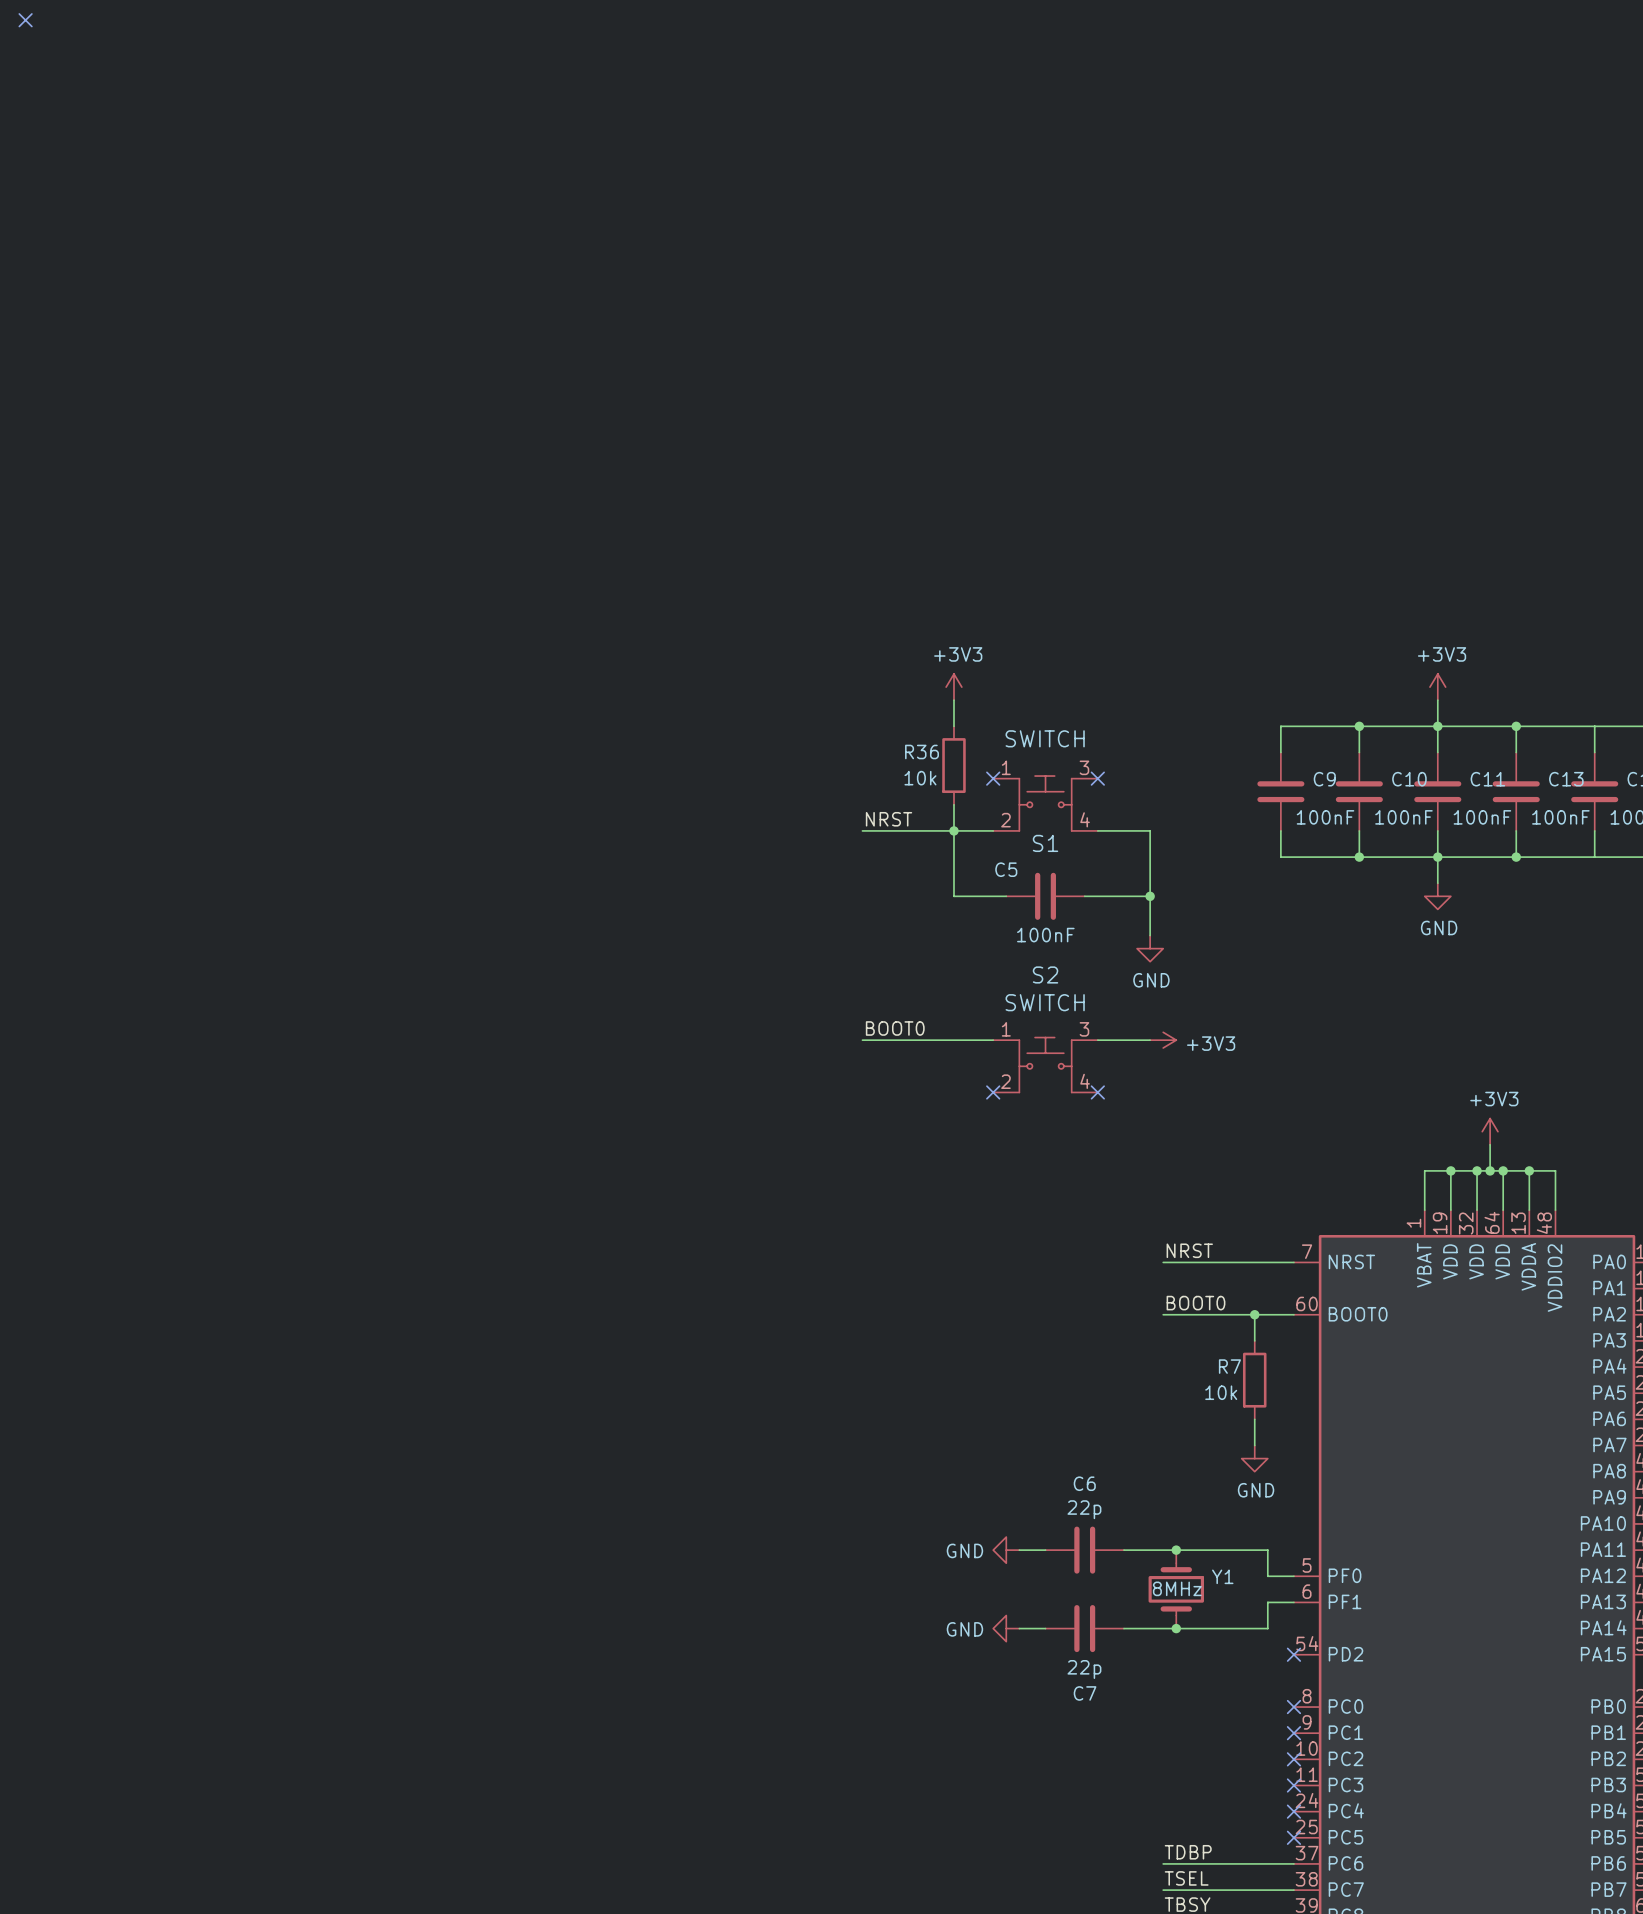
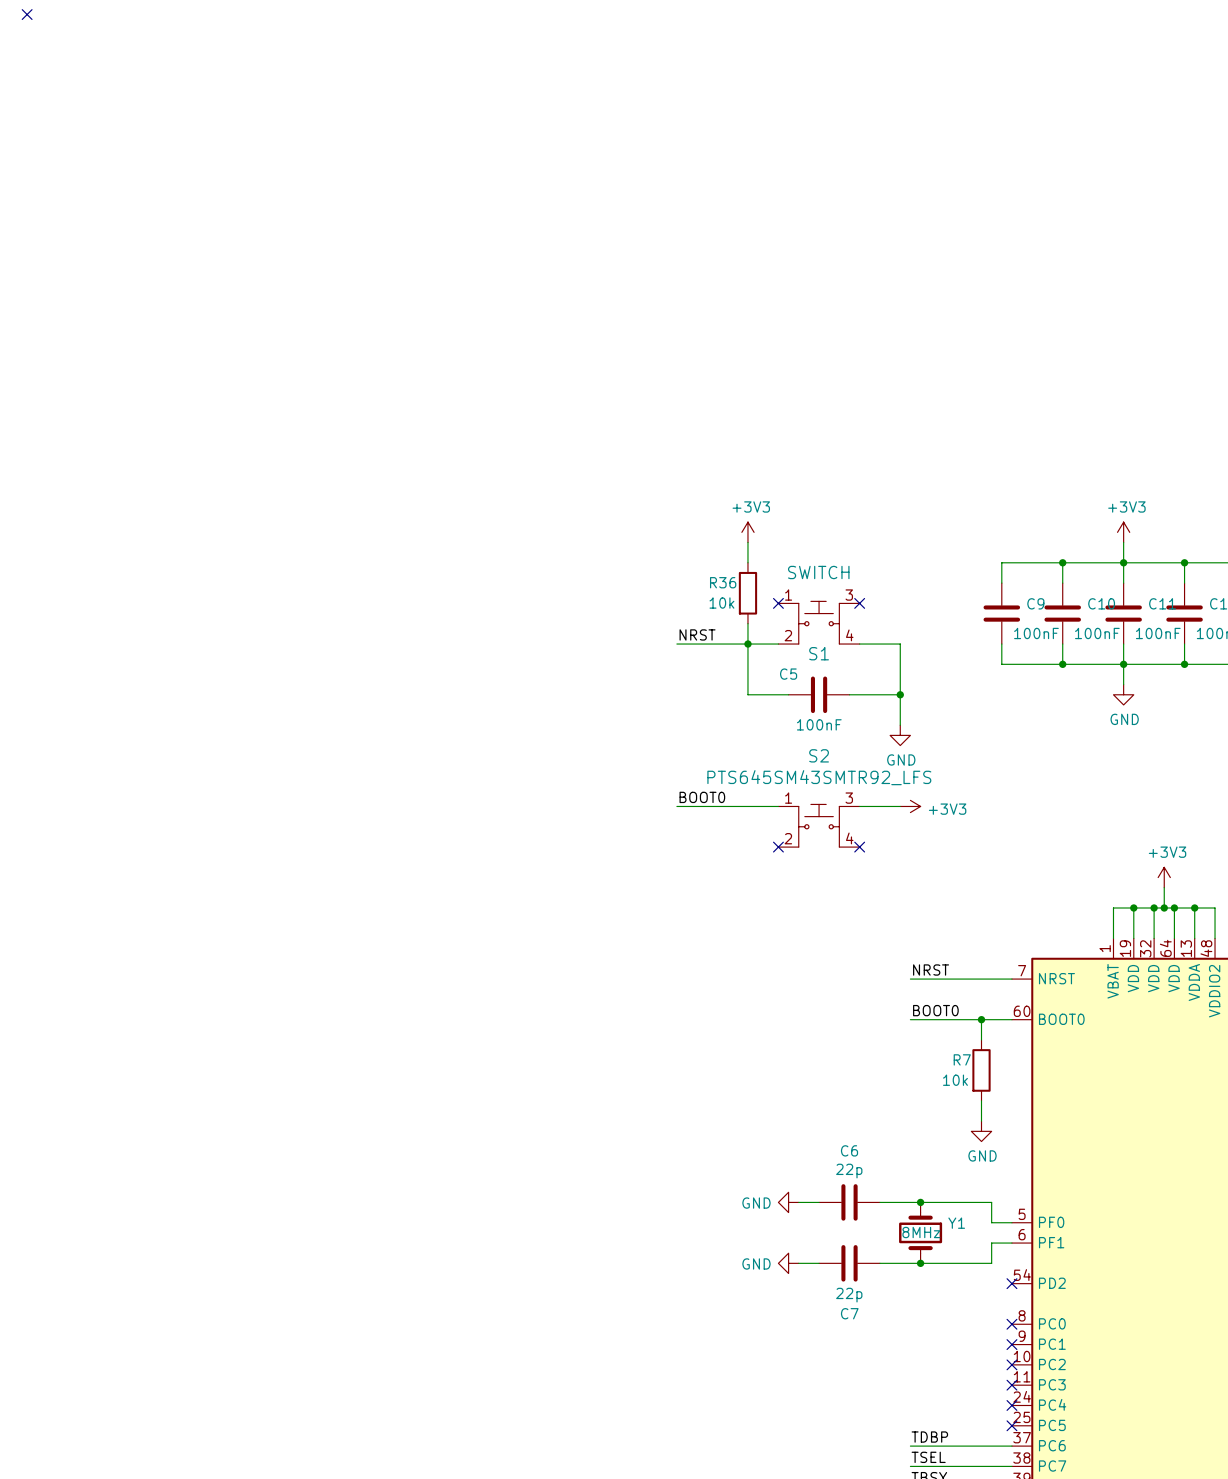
S2 value: SWITCH (1045, 1002) -> PTS645SM43SMTR92_LFS (819, 777)

